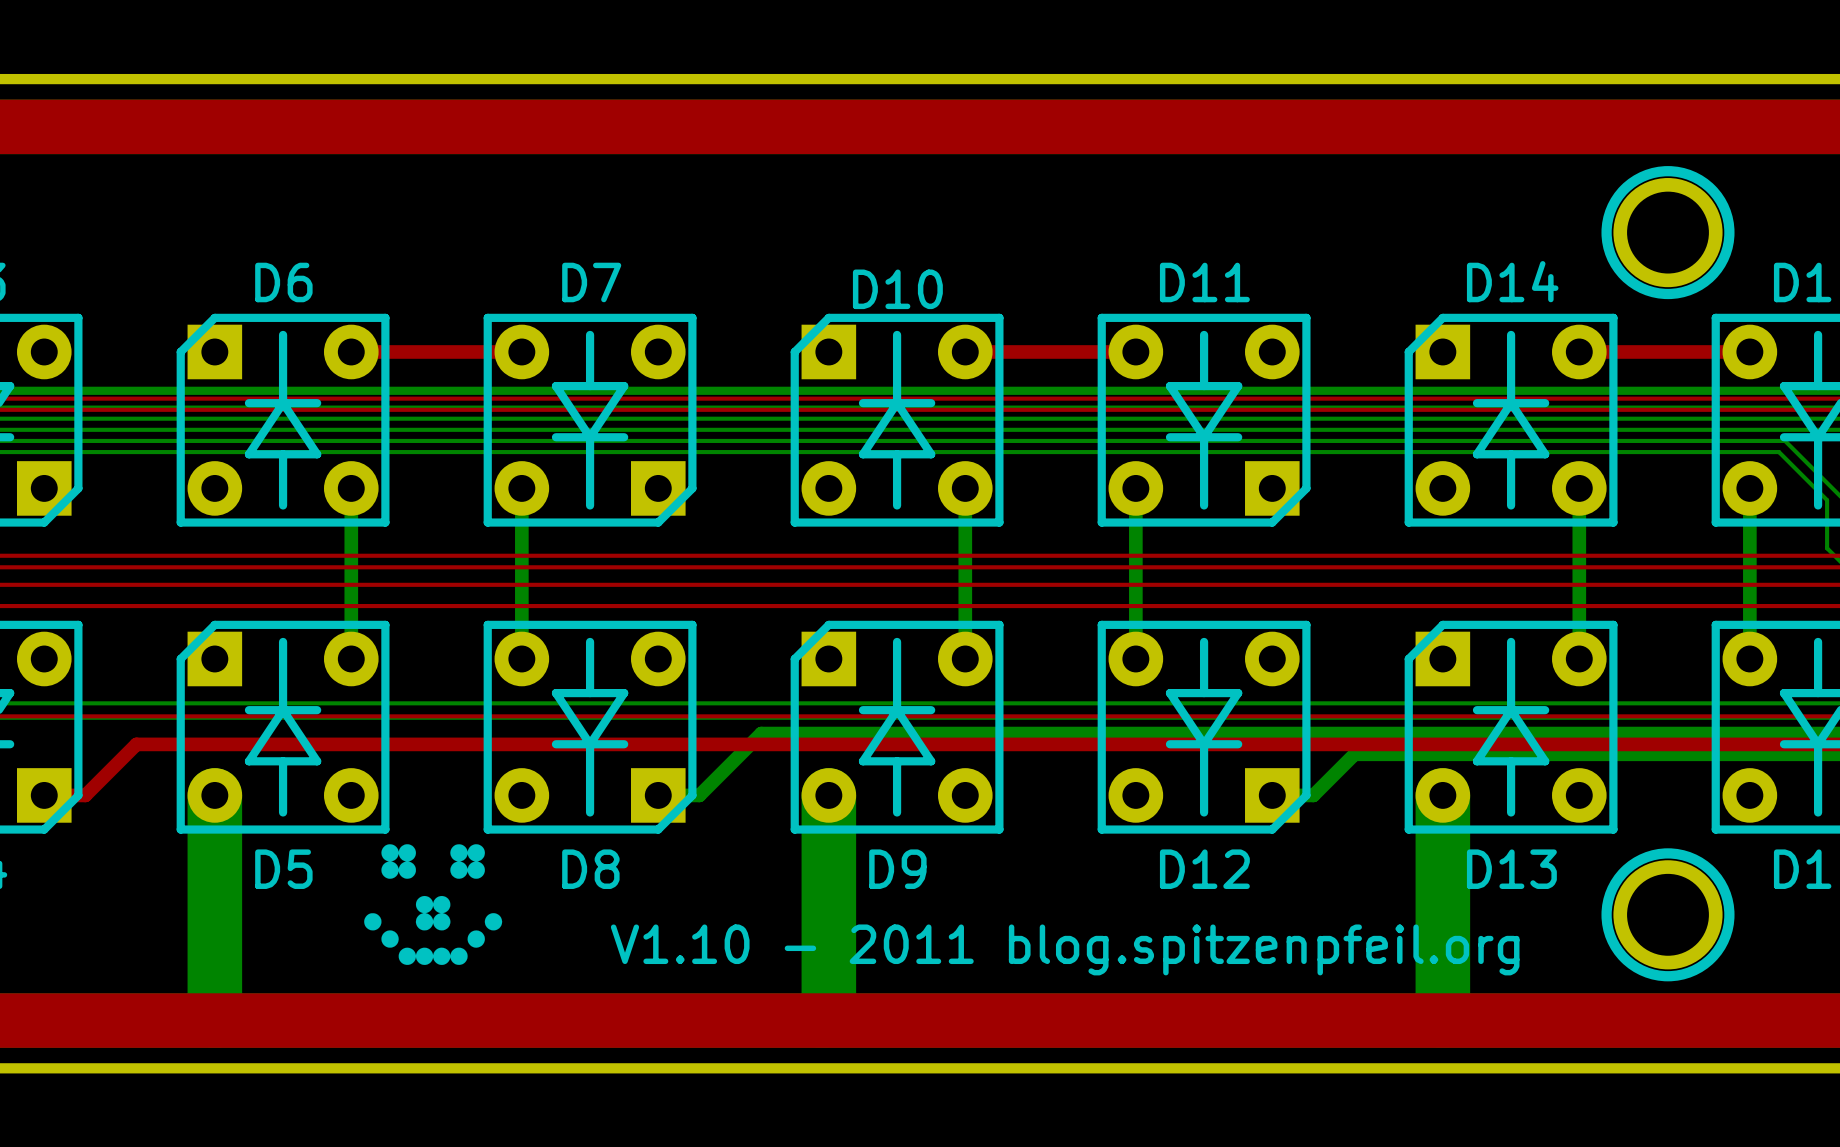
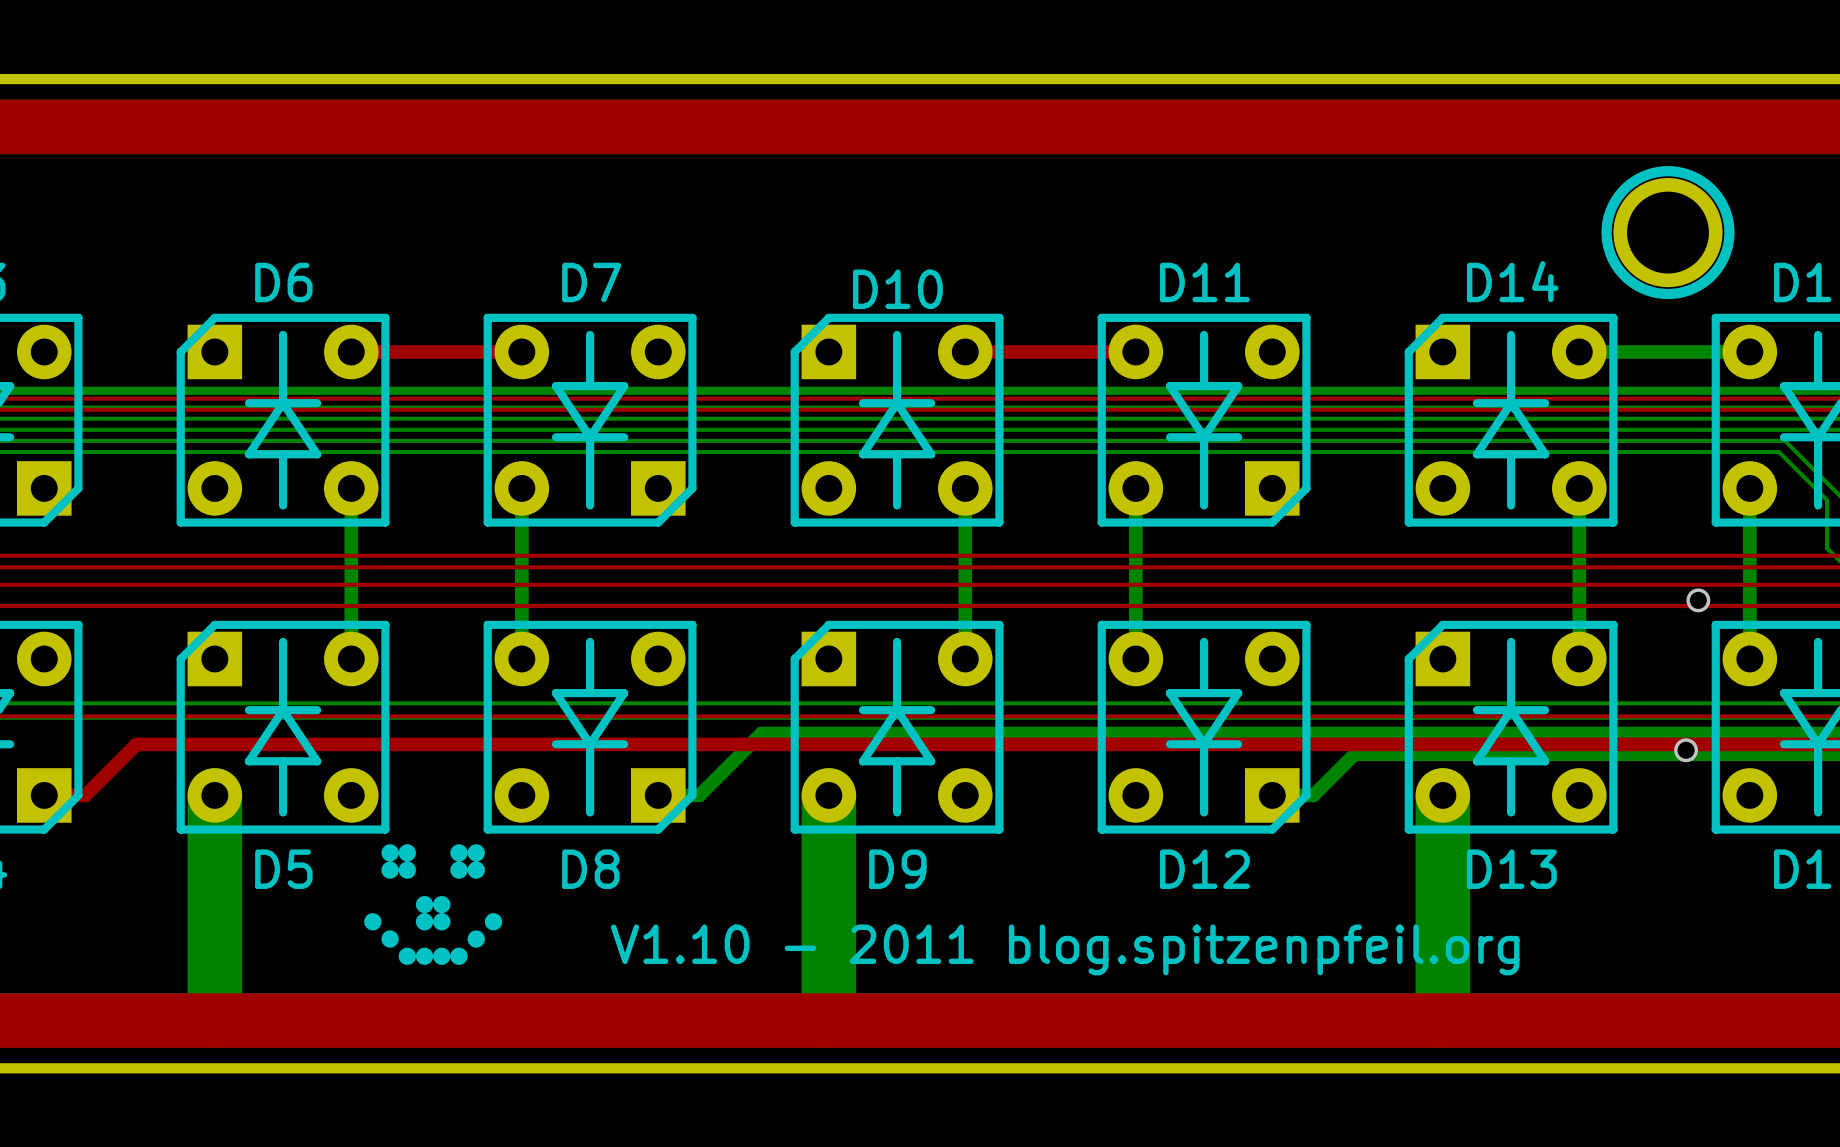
top track: (1579, 351) (1749, 351) -> none
bottom track: none -> (1579, 351) (1749, 351)
via: none -> (1698, 600)
via: none -> (1686, 750)
part: (1667, 914) -> none

